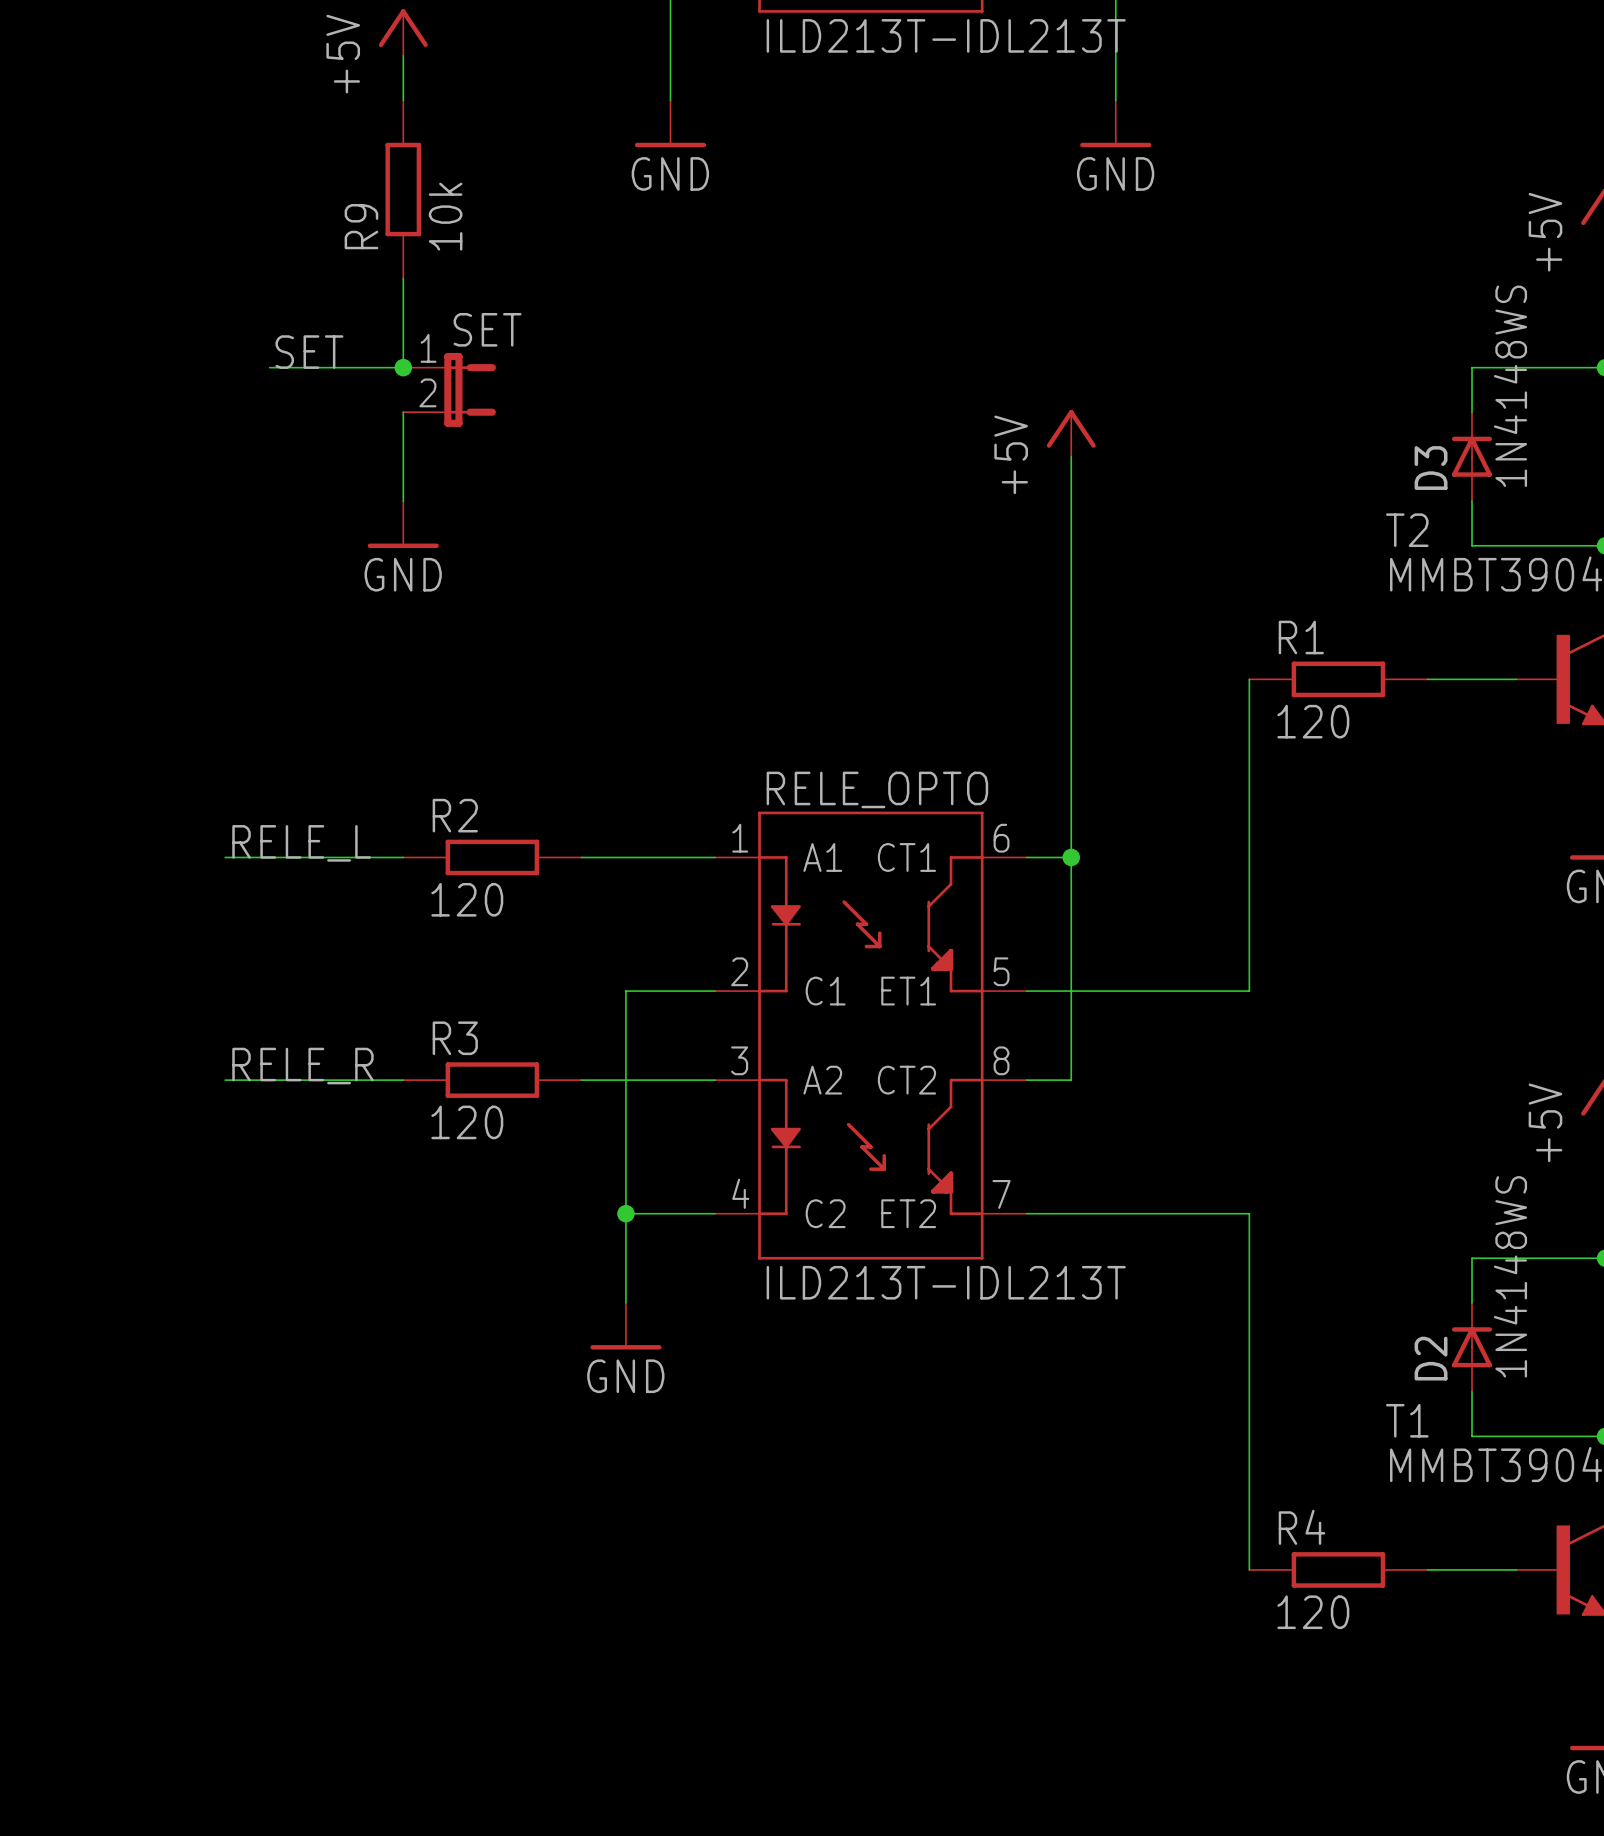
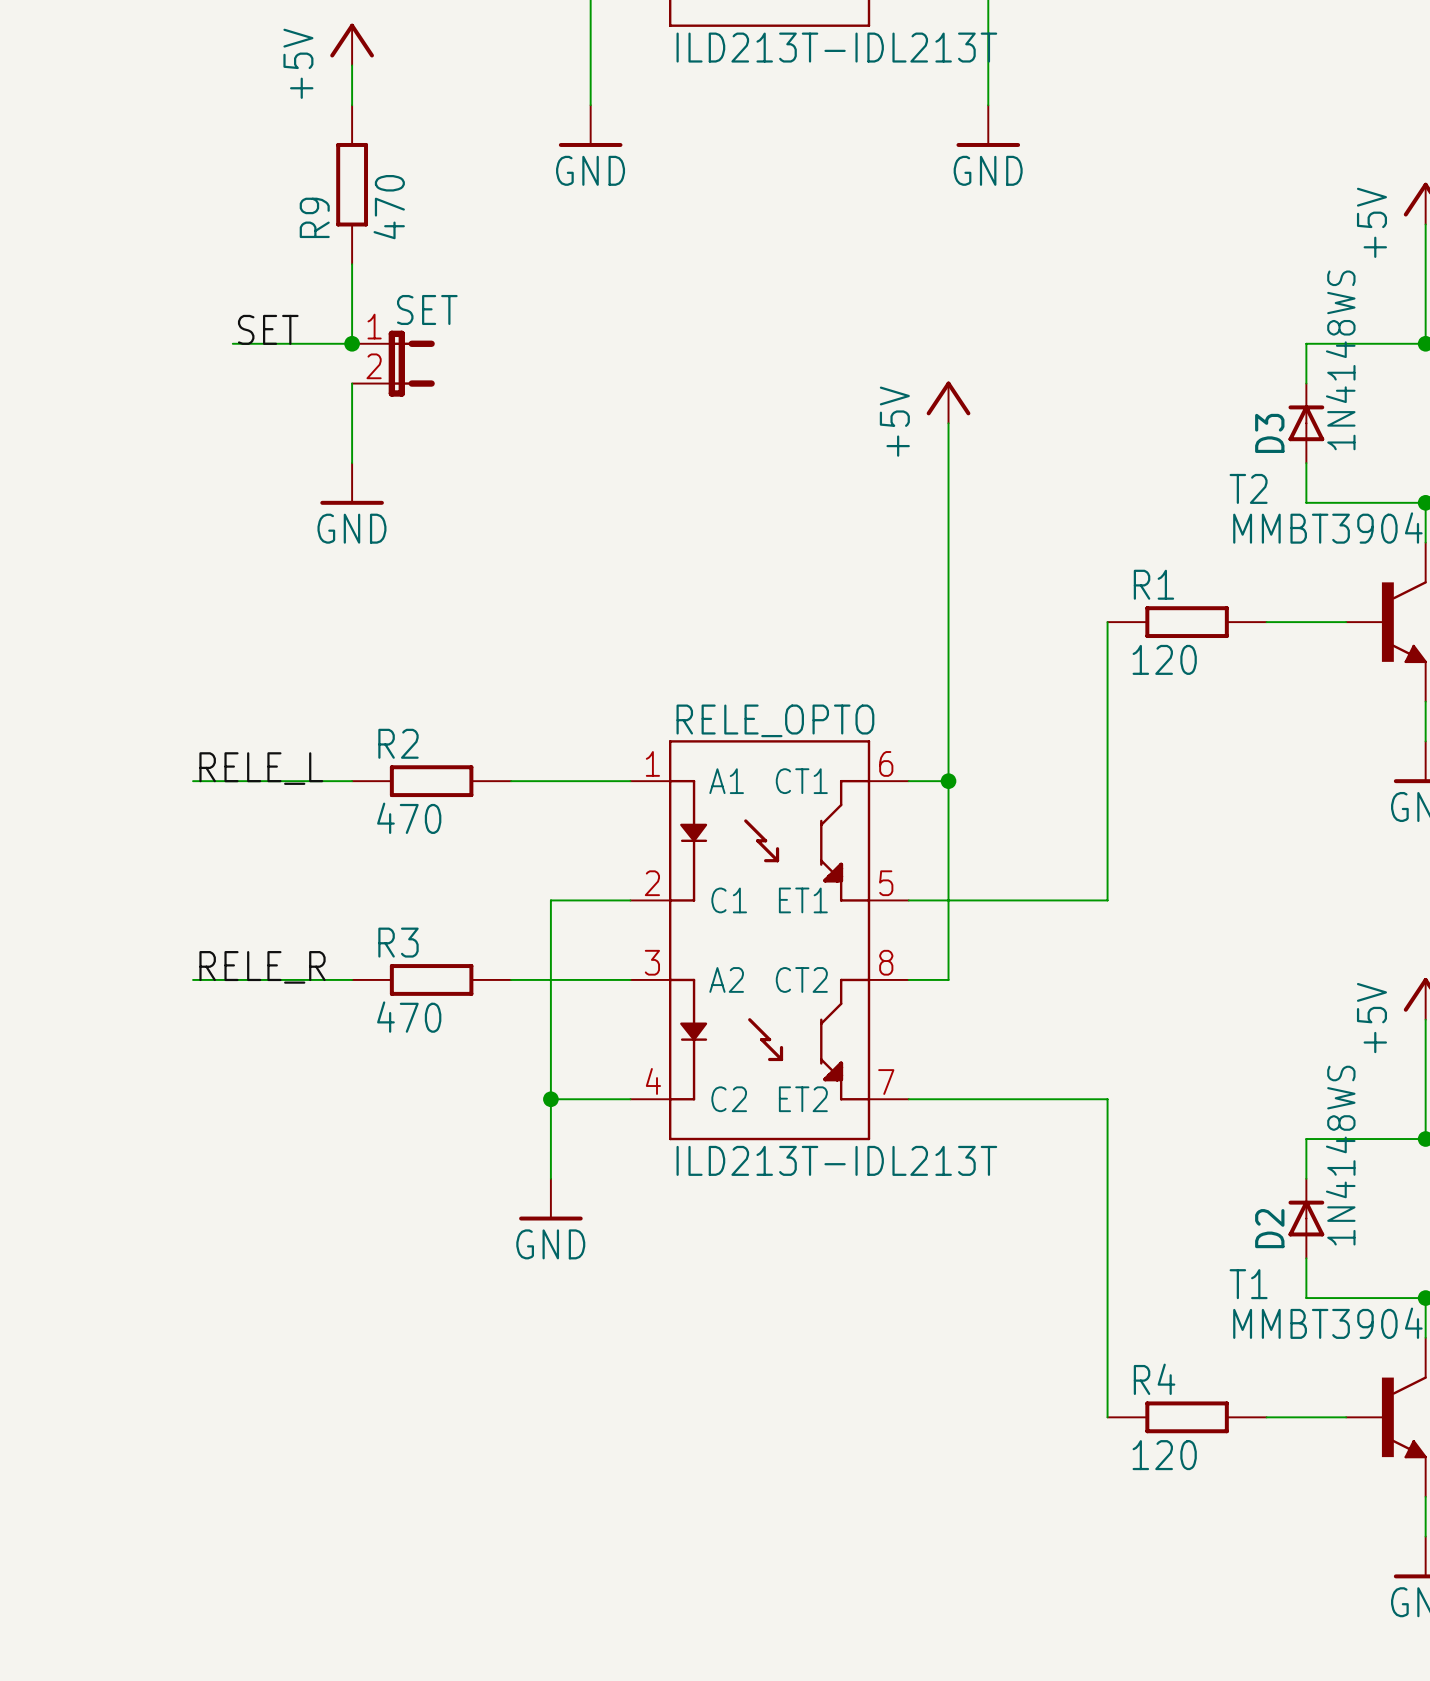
R9 value: 10k (445, 216) -> 470 (389, 207)
R2 value: 120 (467, 899) -> 470 (409, 818)
R3 value: 120 (467, 1122) -> 470 (409, 1017)

